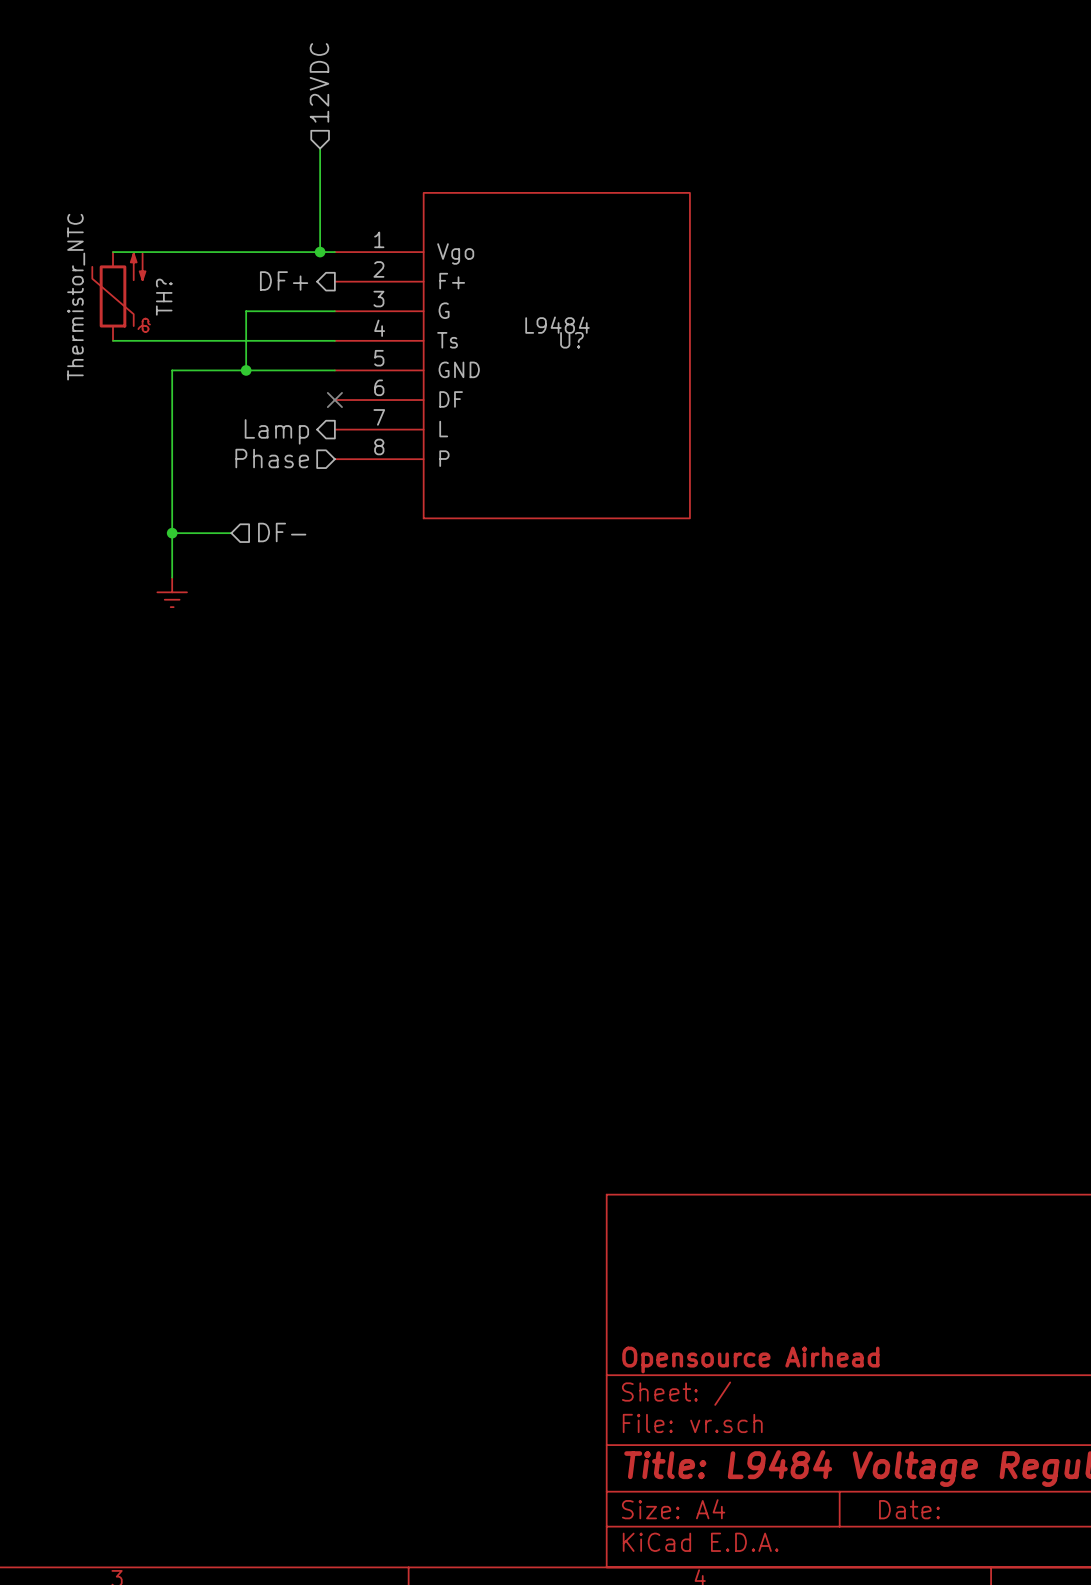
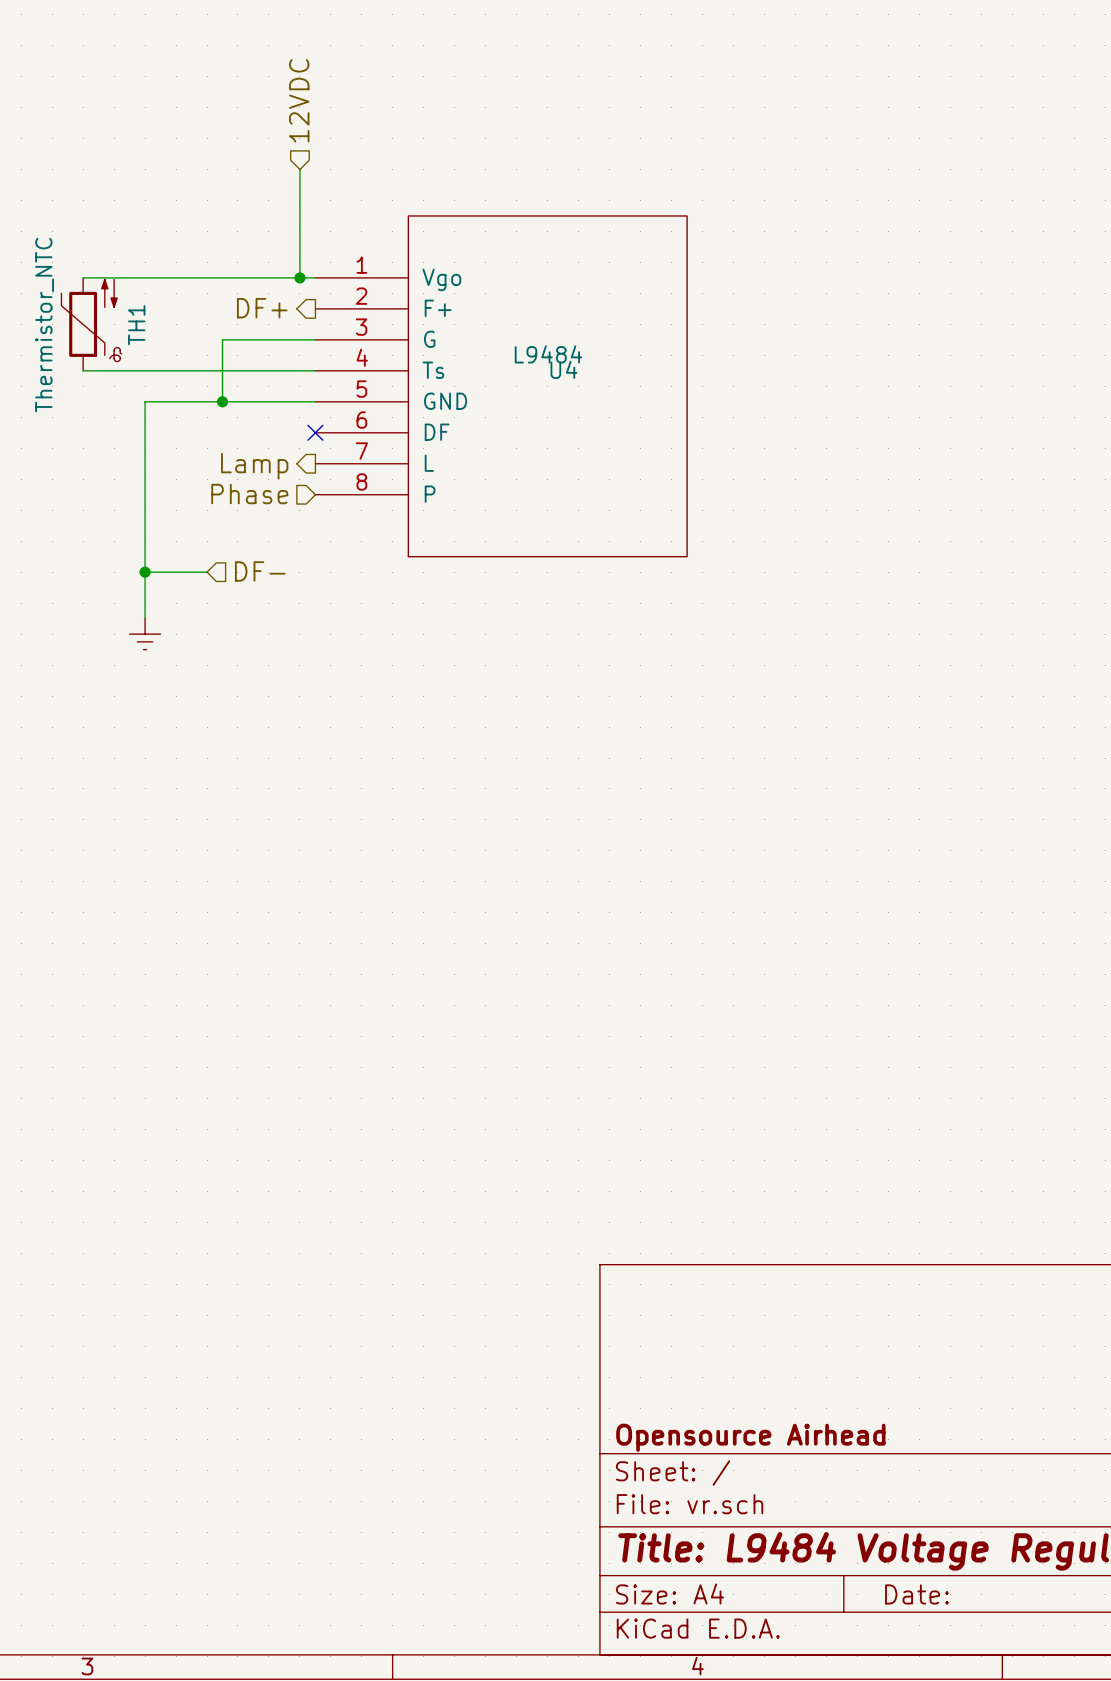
TH? name: TH? (164, 297) -> TH1 (136, 325)
U? name: U? (571, 340) -> U4 (563, 369)

